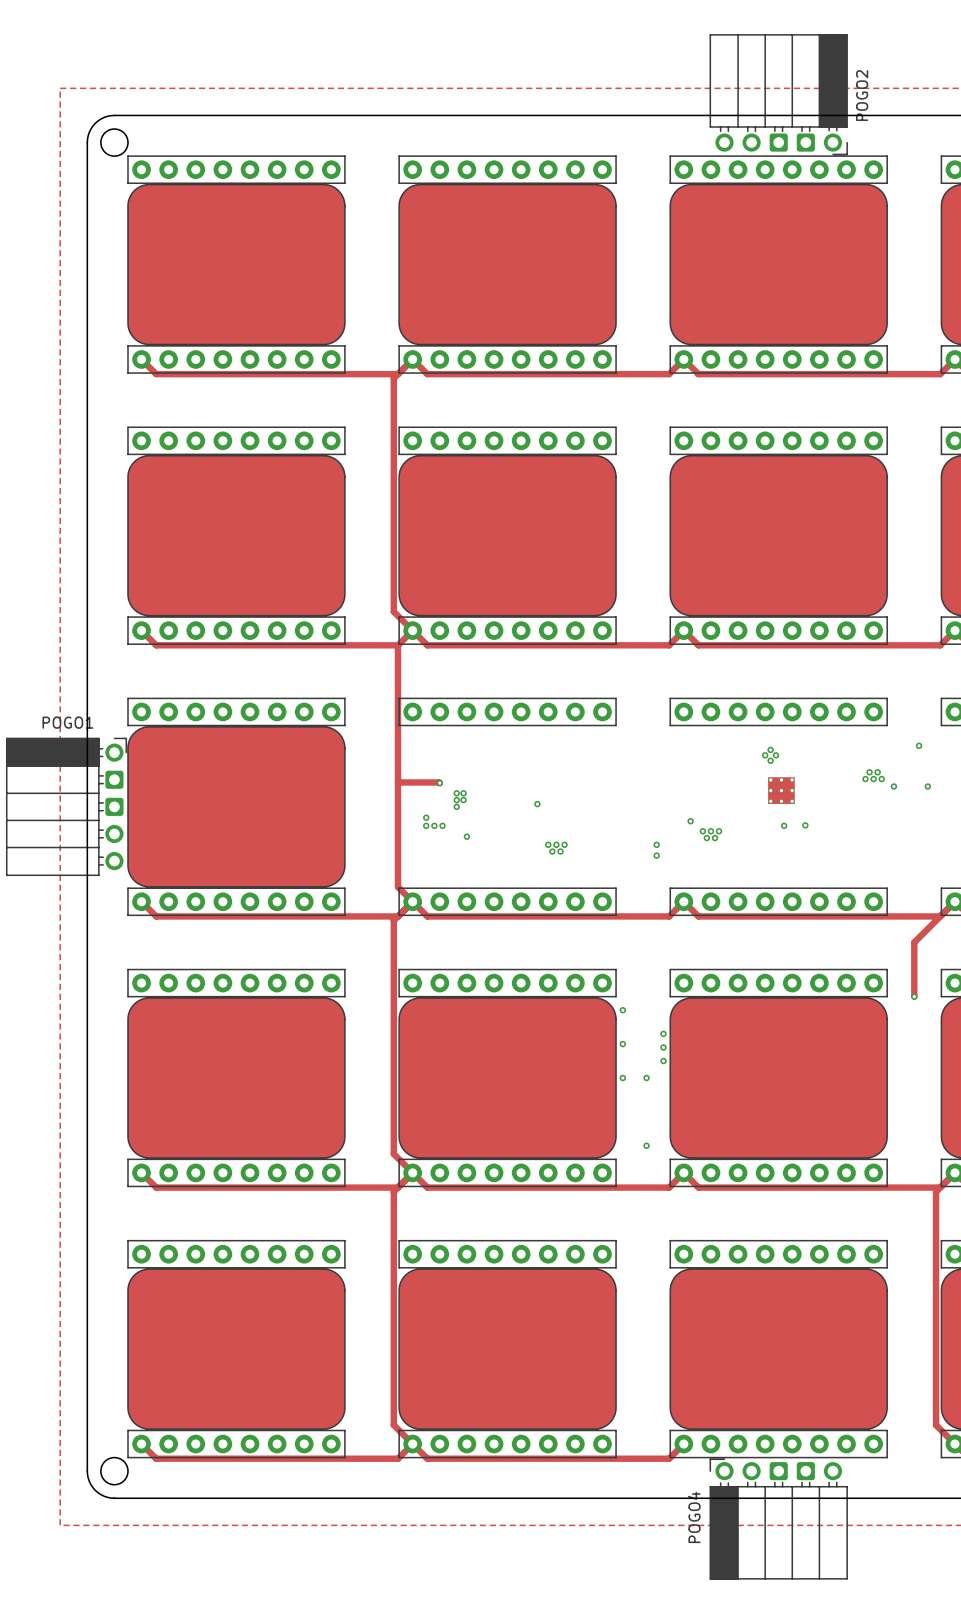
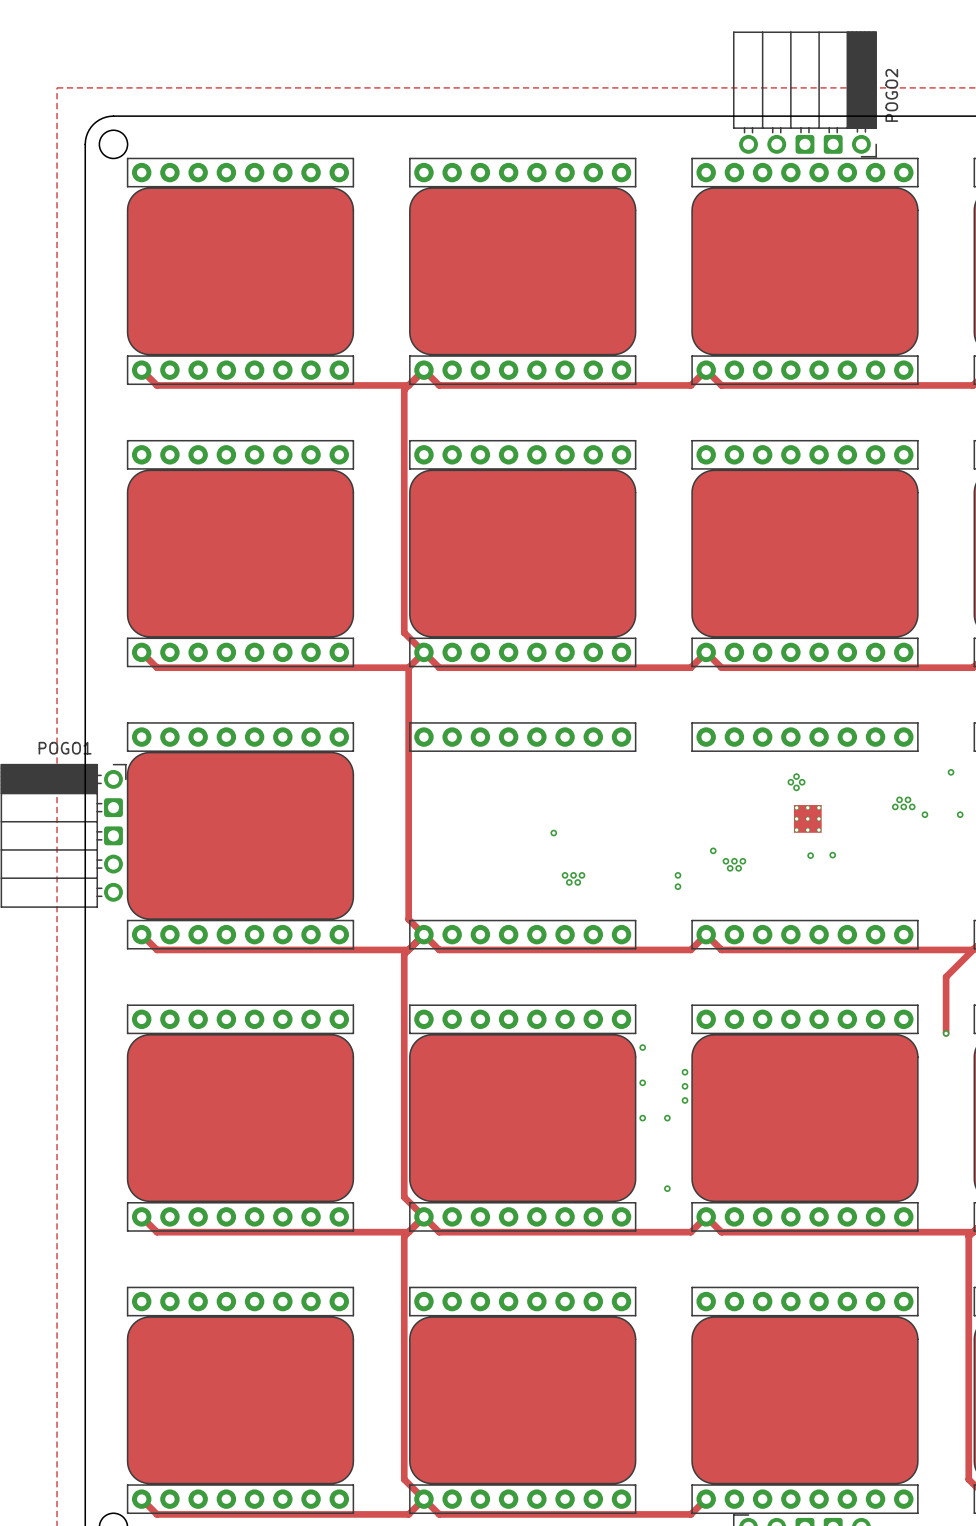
track: (398, 782) (439, 783) -> none
via: (439, 783) -> none
via: (456, 793) -> none
via: (463, 793) -> none
via: (456, 800) -> none
via: (463, 800) -> none
via: (456, 806) -> none
via: (426, 817) -> none
via: (426, 825) -> none
via: (434, 825) -> none
via: (442, 825) -> none
via: (466, 836) -> none

